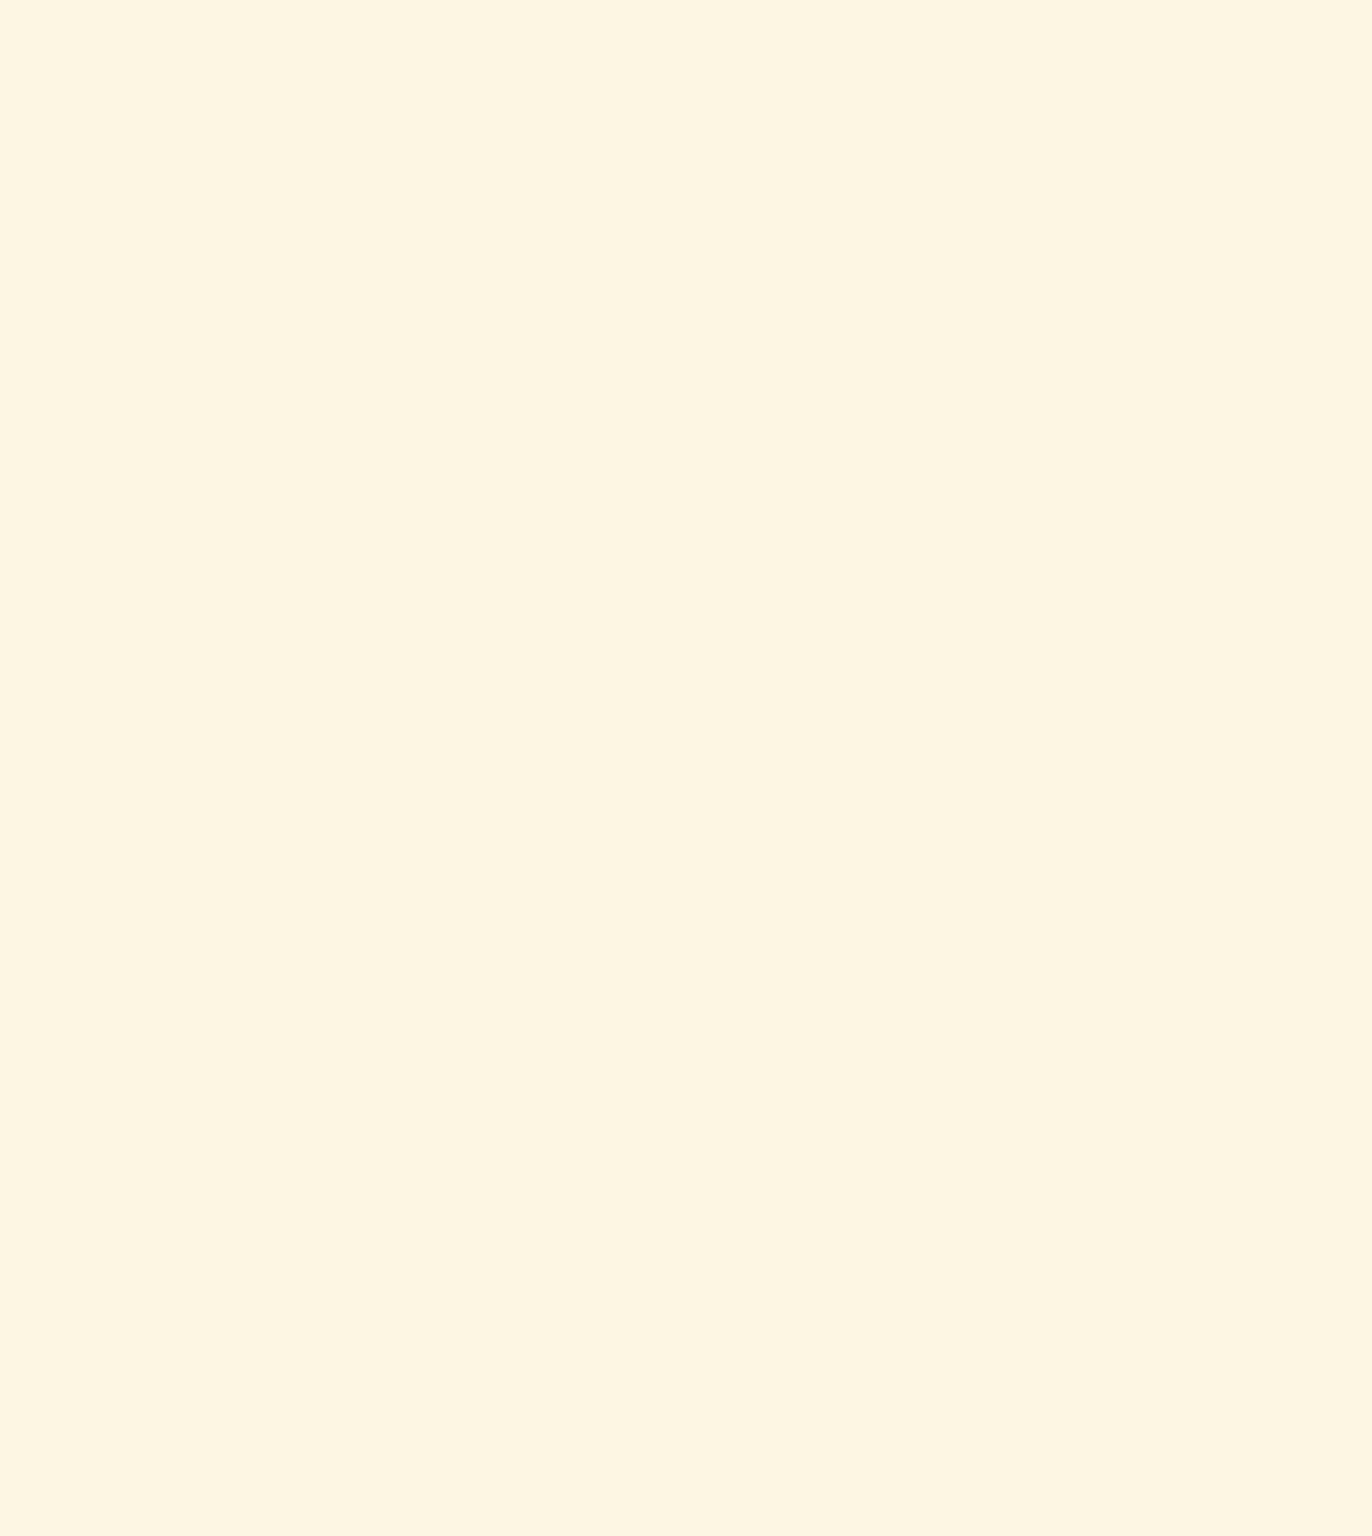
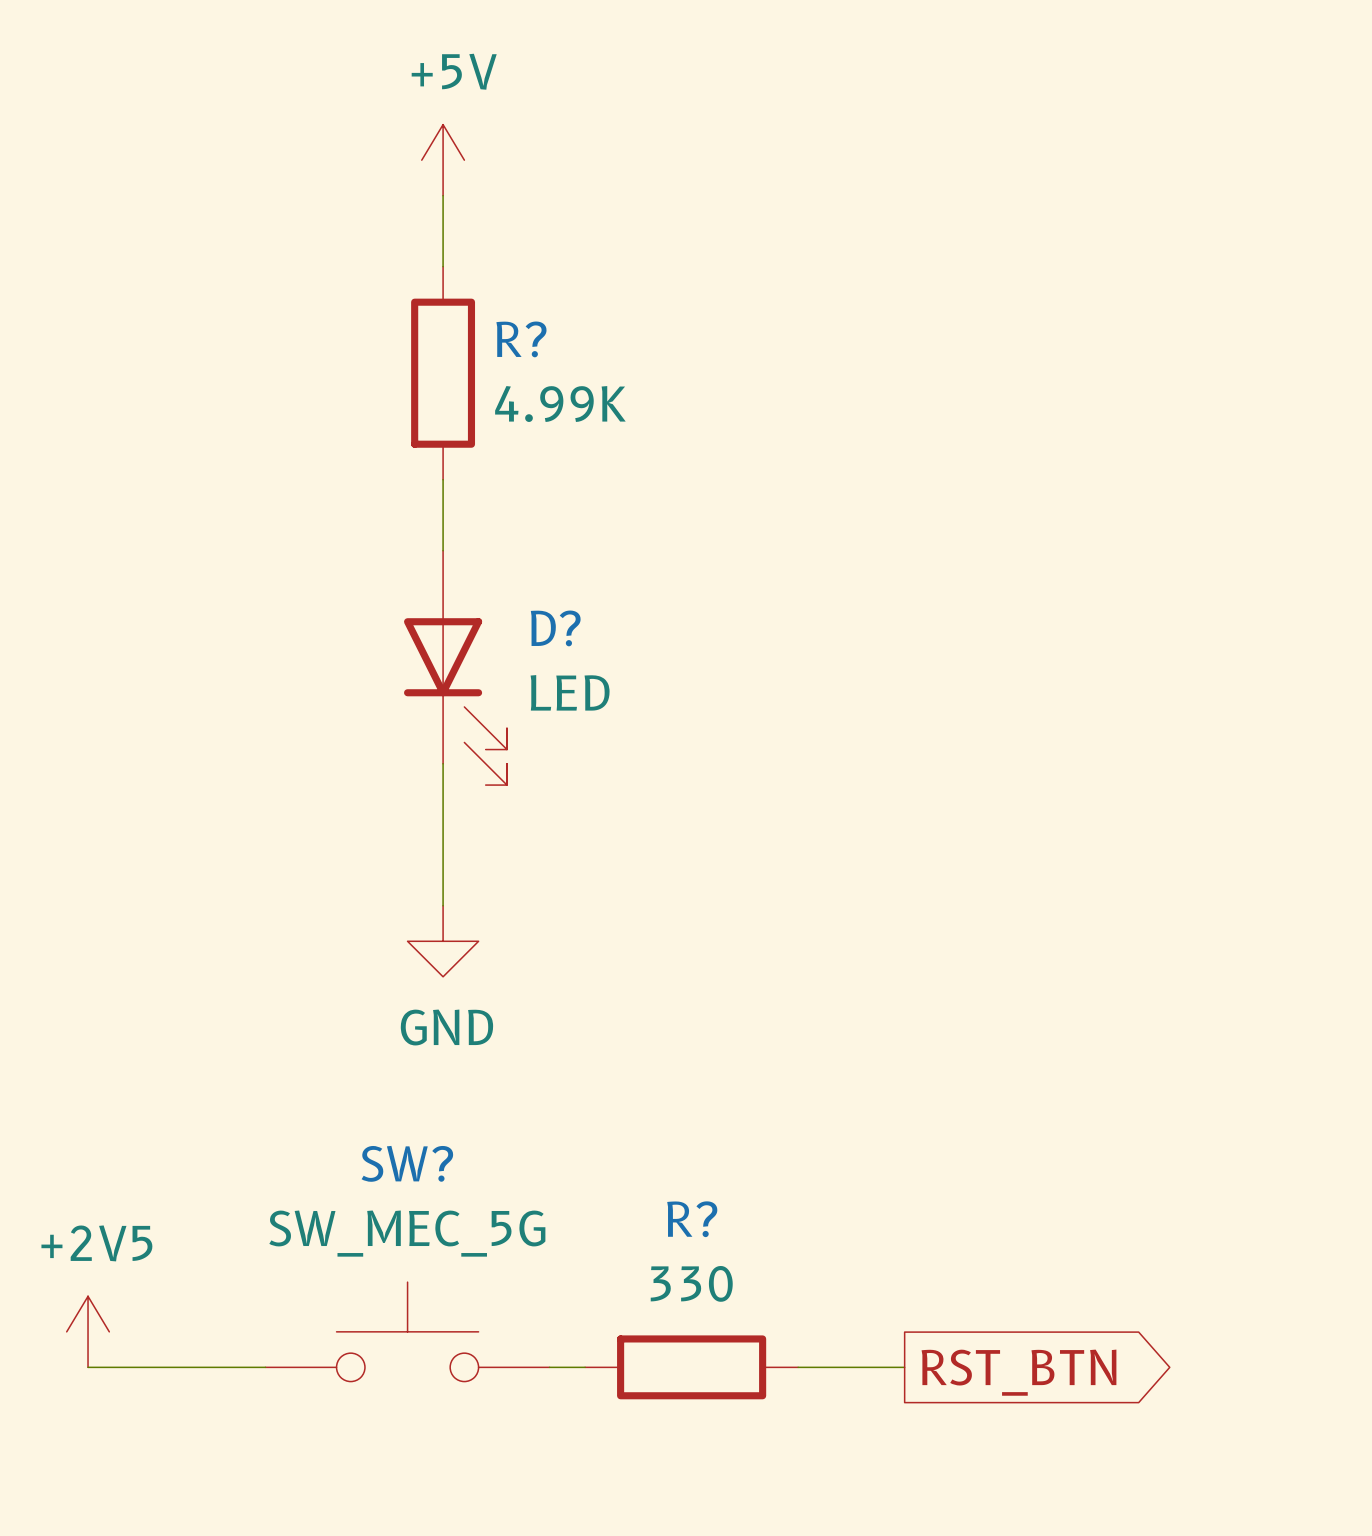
power symbol: none -> +5V (443, 160)
wire: none -> (443, 195) (443, 266)
R?: none -> 4.99K (443, 373)
wire: none -> (443, 479) (443, 550)
D?: none -> LED (455, 667)
wire: none -> (443, 763) (443, 905)
power symbol: none -> GND (443, 941)
power symbol: none -> +2V5 (88, 1331)
SW?: none -> SW_MEC_5G (407, 1331)
wire: none -> (88, 1367) (265, 1367)
wire: none -> (549, 1367) (585, 1367)
R?: none -> 330 (691, 1367)
wire: none -> (798, 1367) (904, 1367)
global label: none -> RST_BTN (1018, 1372)

